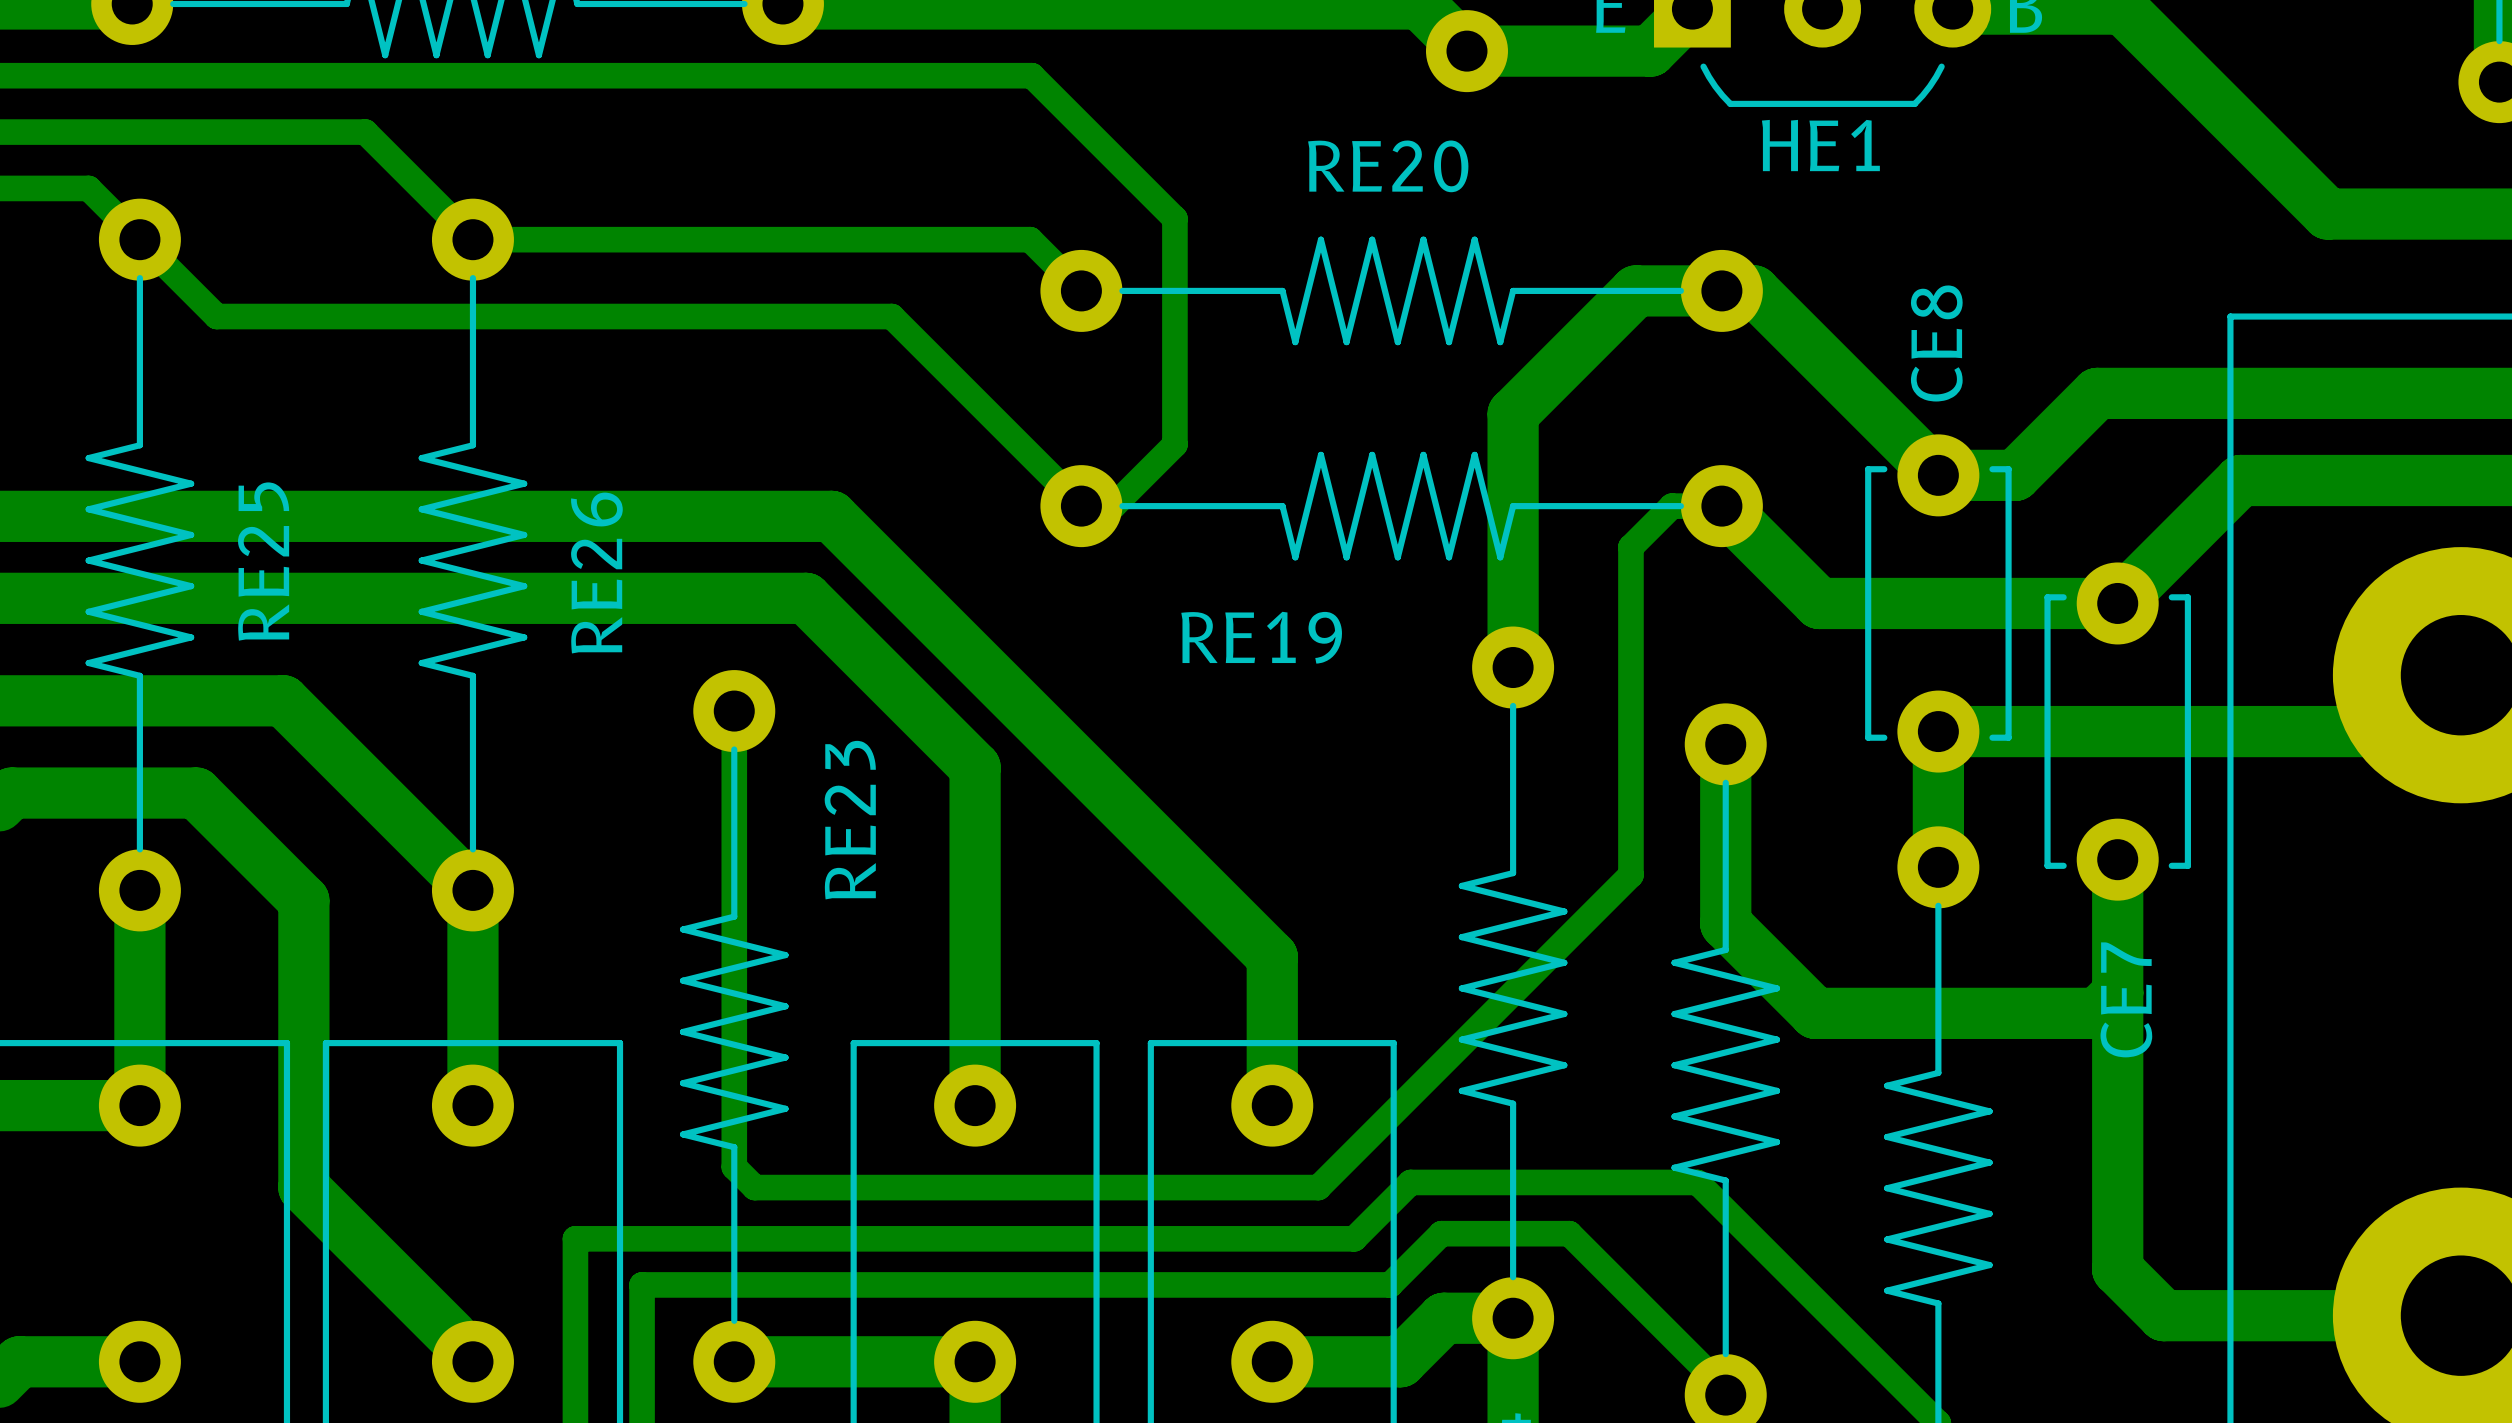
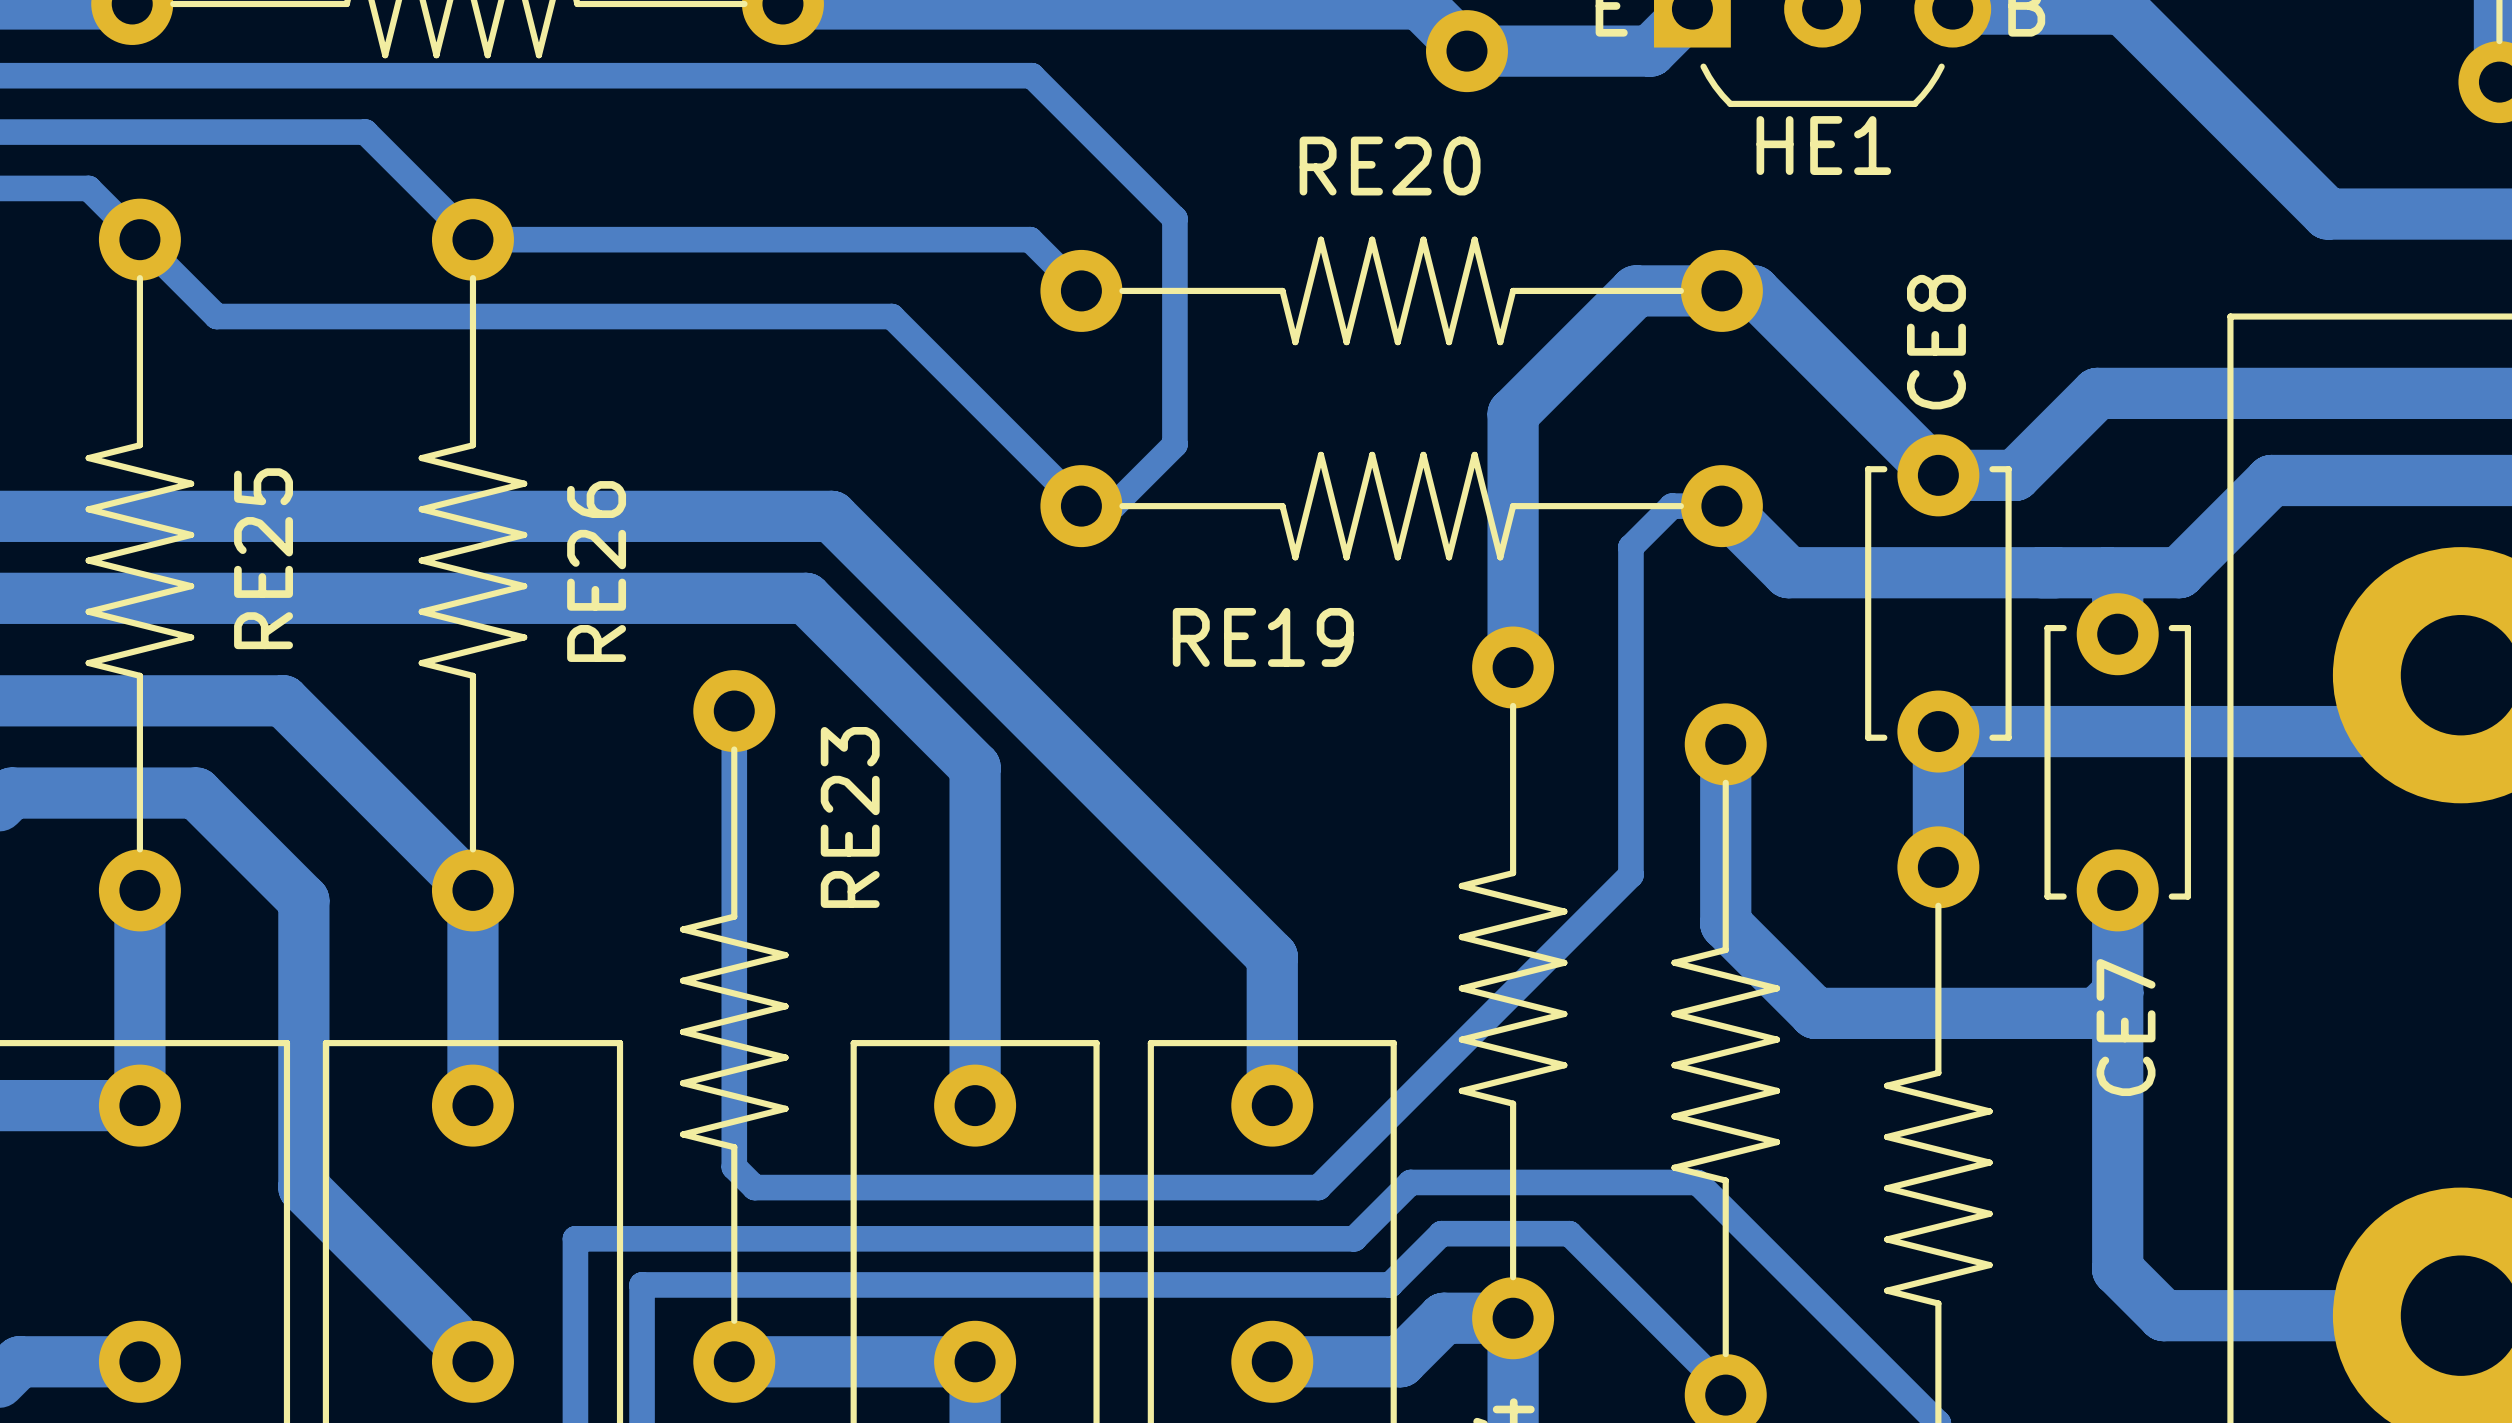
bottom track: (2271, 480) (2240, 480) (2117, 603) (1819, 603) (1788, 572) -> (2271, 480) (2179, 572) (1788, 572)
CE7 position: (2117, 731) -> (2117, 762)

